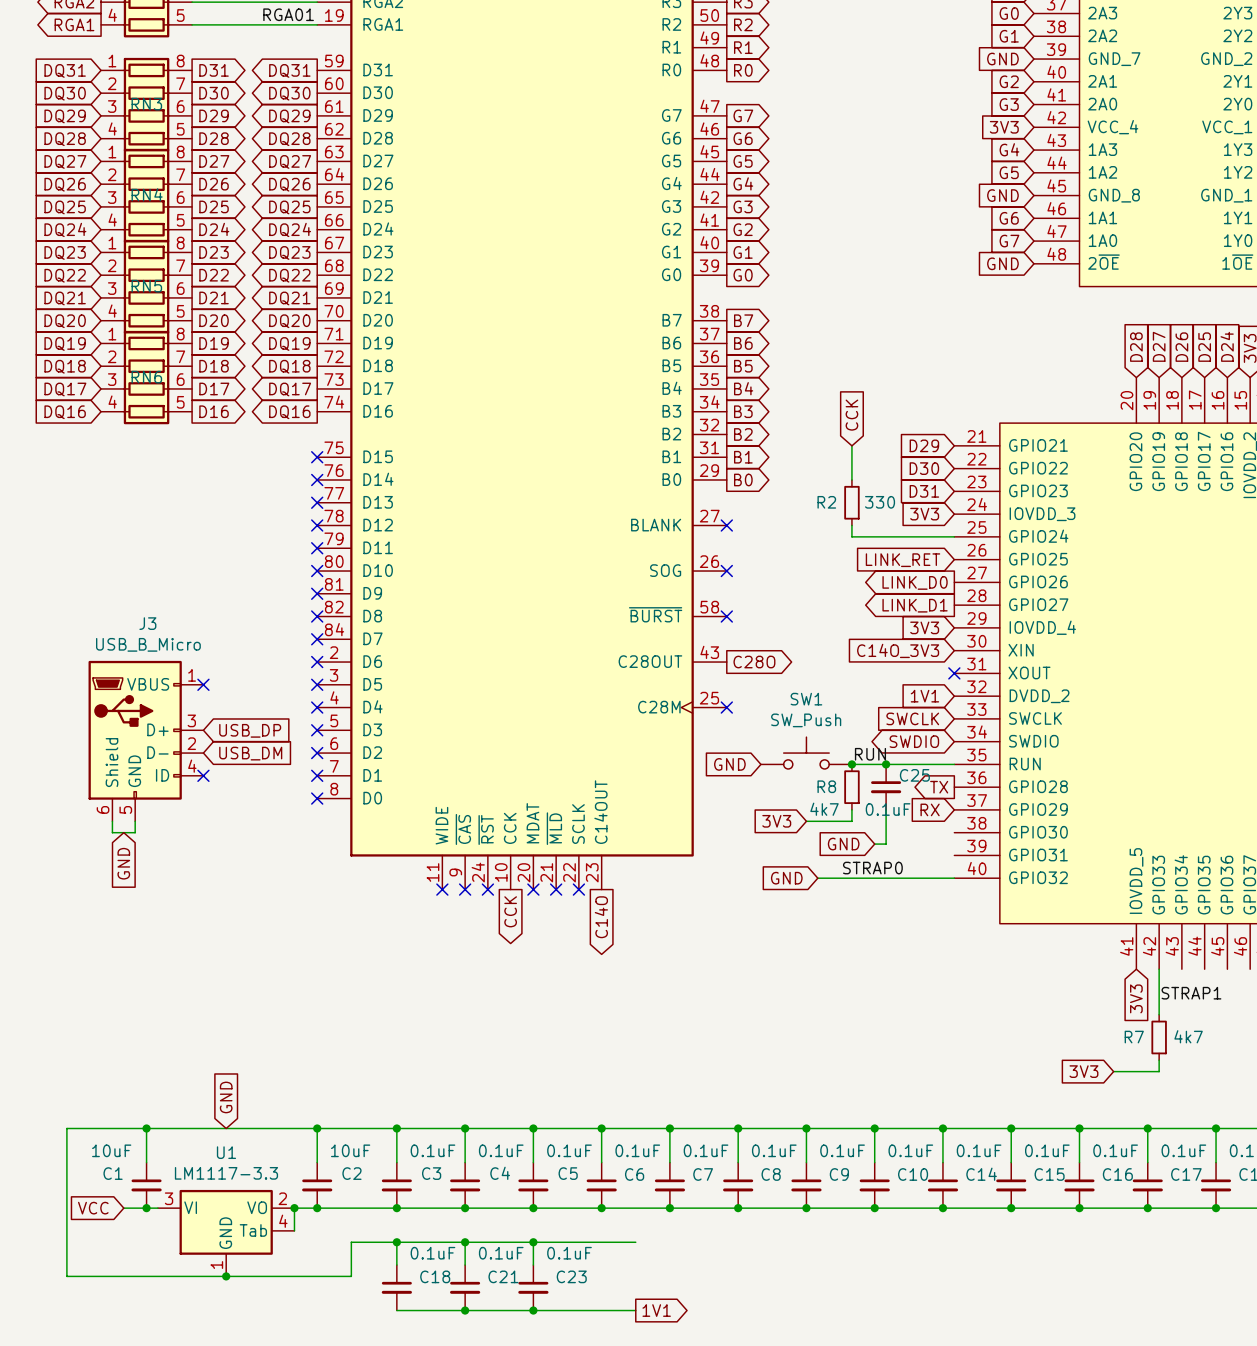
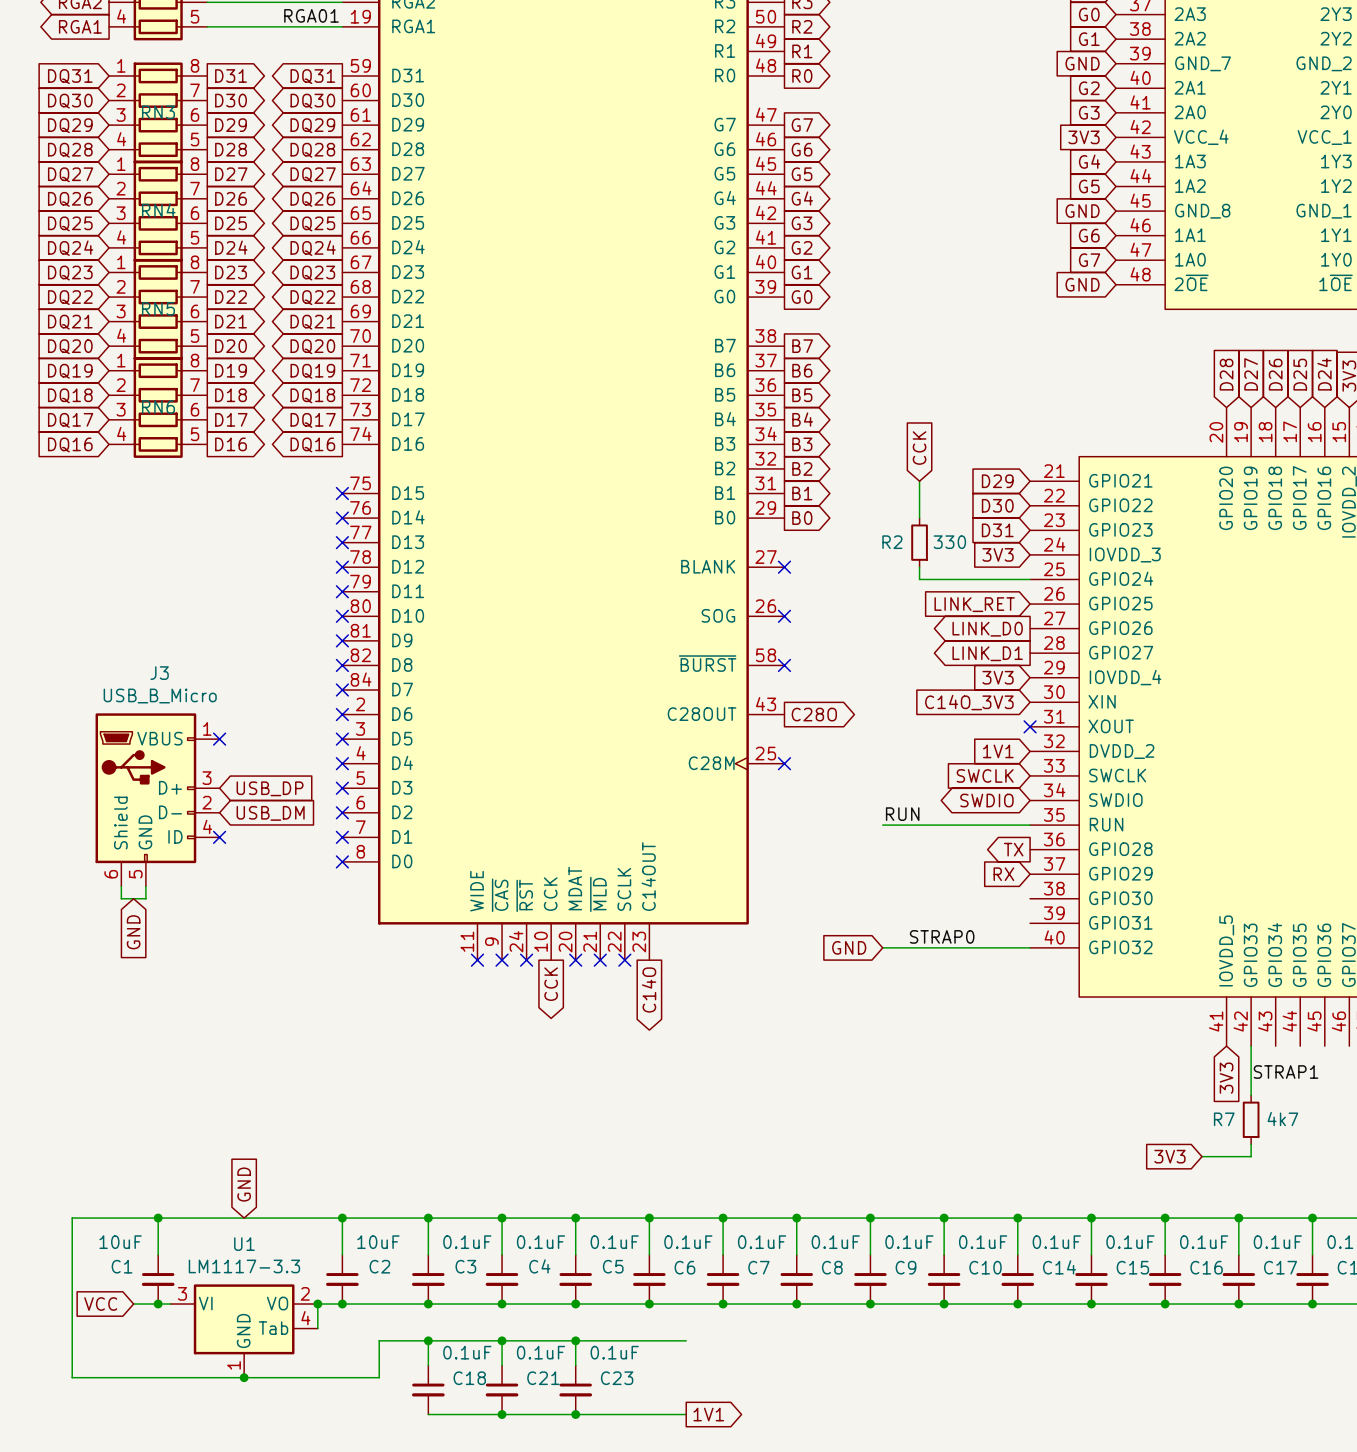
SW1: SW_Push (806, 753) -> none
label position: RUN (870, 754) -> RUN (902, 814)
global label: GND (729, 764) -> none
junction: (851, 764) -> none
junction: (886, 764) -> none
R8: 4k7 (851, 787) -> none
C25: 0.1uF (886, 787) -> none
wire: (851, 809) (851, 821) (806, 821) -> none
wire: (886, 809) (886, 844) (874, 844) -> none
global label: 3V3 (776, 821) -> none
global label: GND (843, 844) -> none

